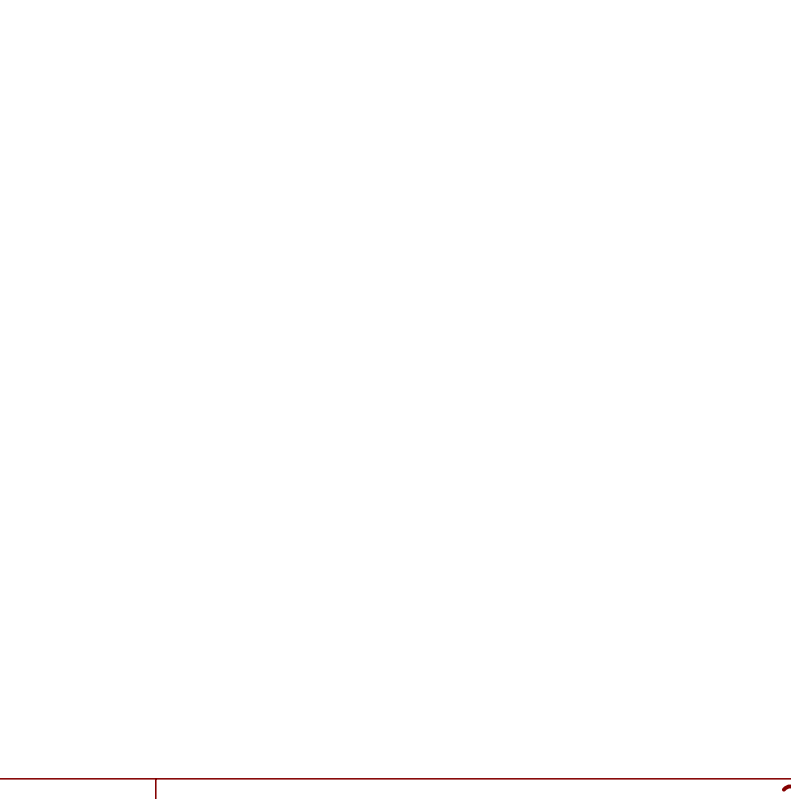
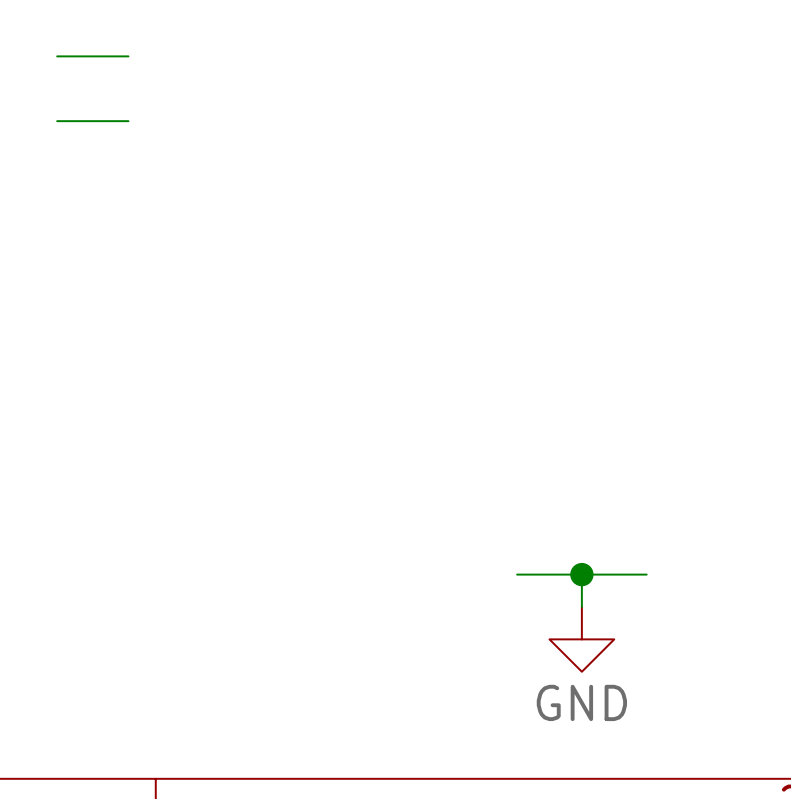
wire: none -> (57, 56) (128, 56)
wire: none -> (57, 121) (128, 121)
wire: none -> (517, 574) (646, 574)
wire: none -> (581, 574) (581, 606)
junction: none -> (581, 574)
power symbol: none -> GND (581, 639)

